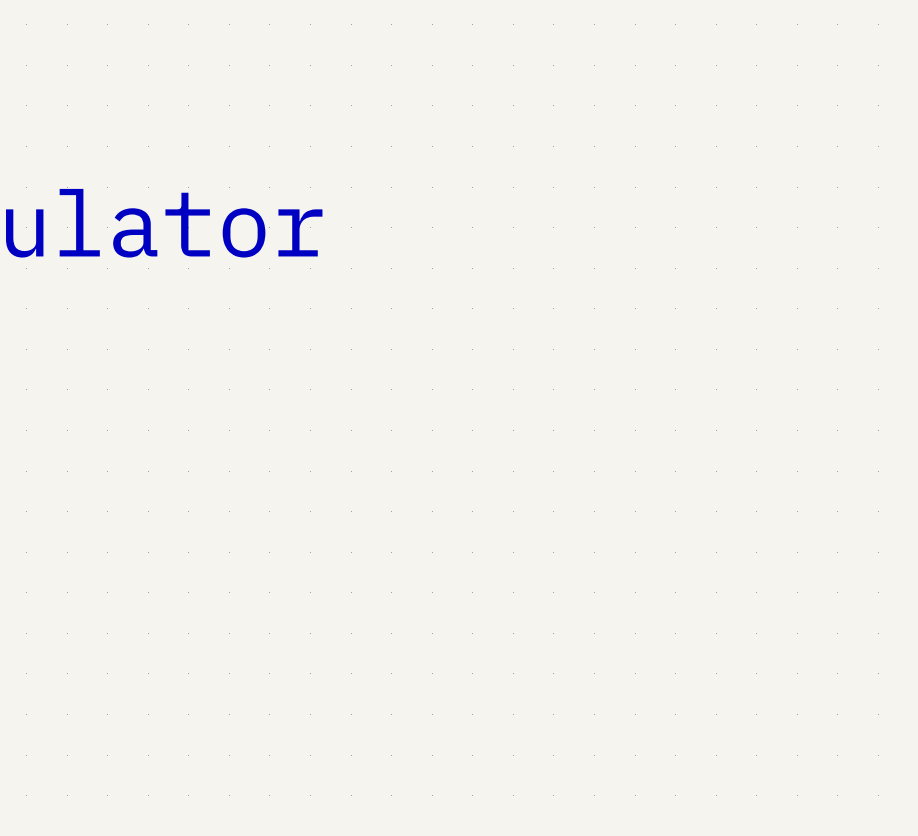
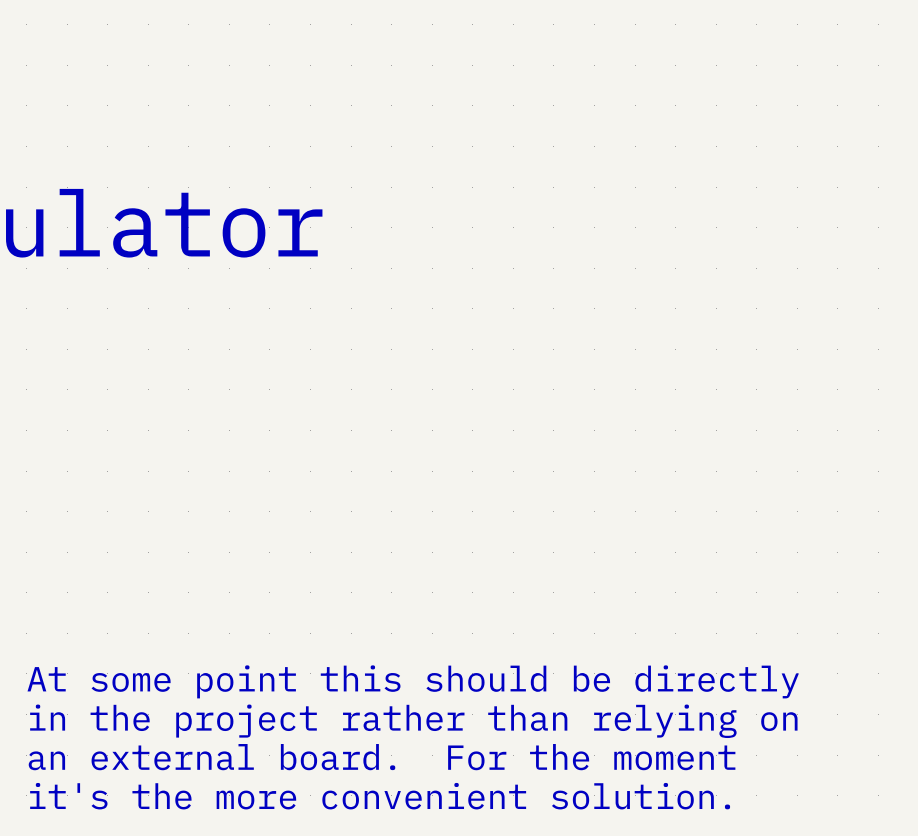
text: none -> At some point this should be directly (413, 681)
text: none -> in the project rather than relying on (413, 721)
text: none -> an external board. For the moment (382, 757)
text: none -> it's the more convenient solution. (380, 796)

